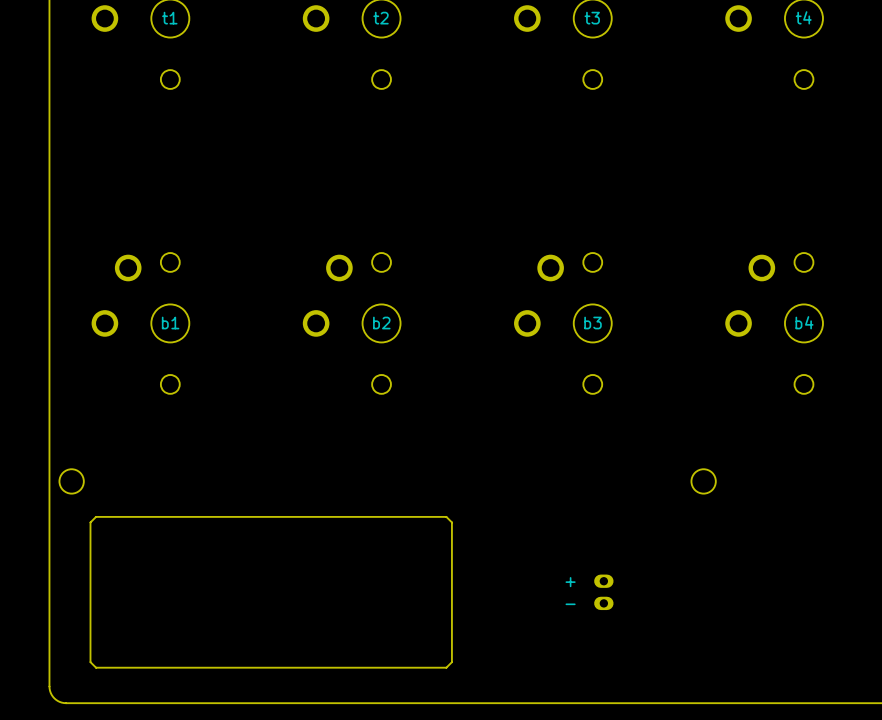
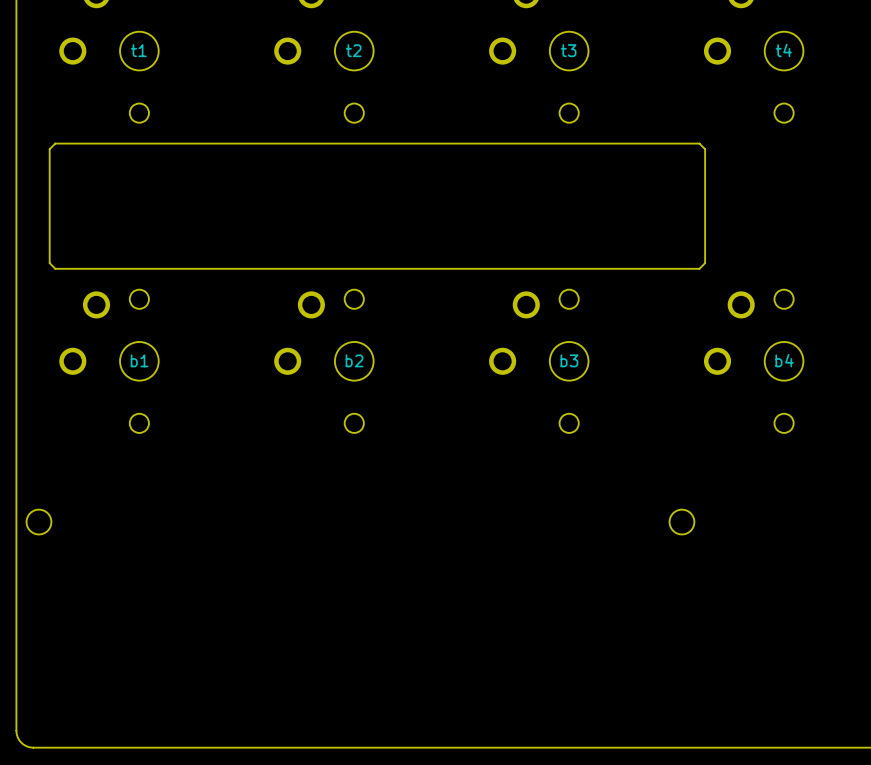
drawing: none -> [49, 143, 706, 270]
drawing: [90, 516, 453, 668] -> none
part: (603, 592) -> none

